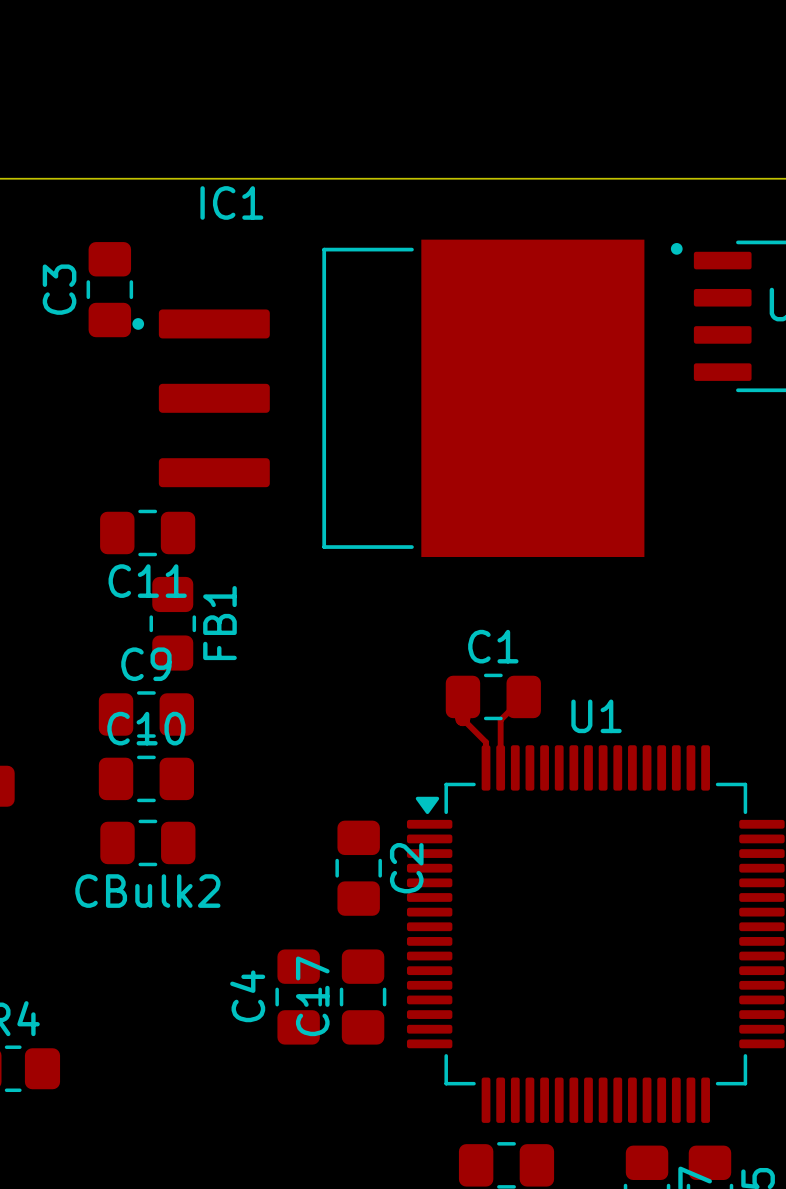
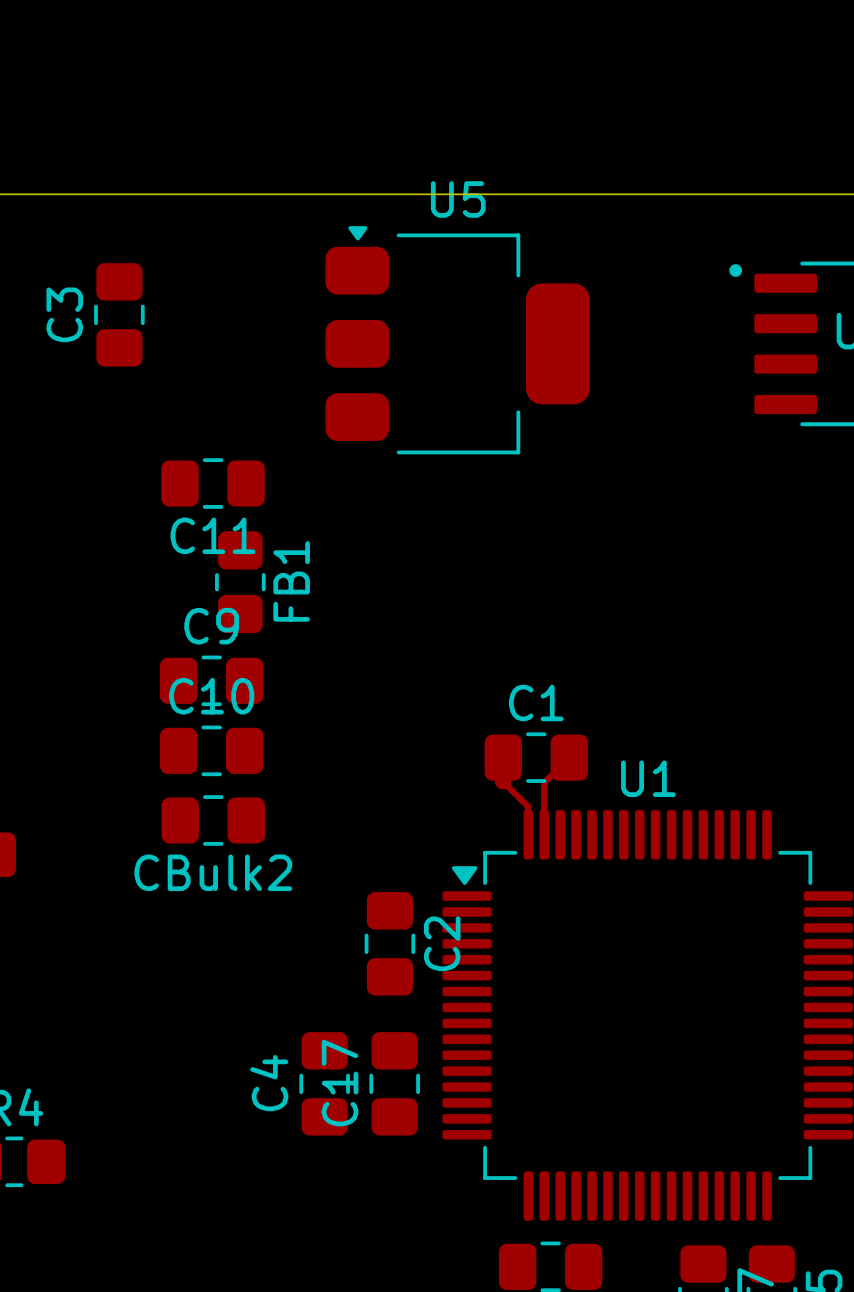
U5: none -> (457, 340)
IC1: (388, 398) -> none
C11 position: (147, 532) -> (213, 483)
FB1 position: (172, 623) -> (240, 582)
C9 position: (146, 714) -> (211, 680)
C10 position: (146, 778) -> (211, 750)
CBulk2 position: (147, 842) -> (213, 820)

